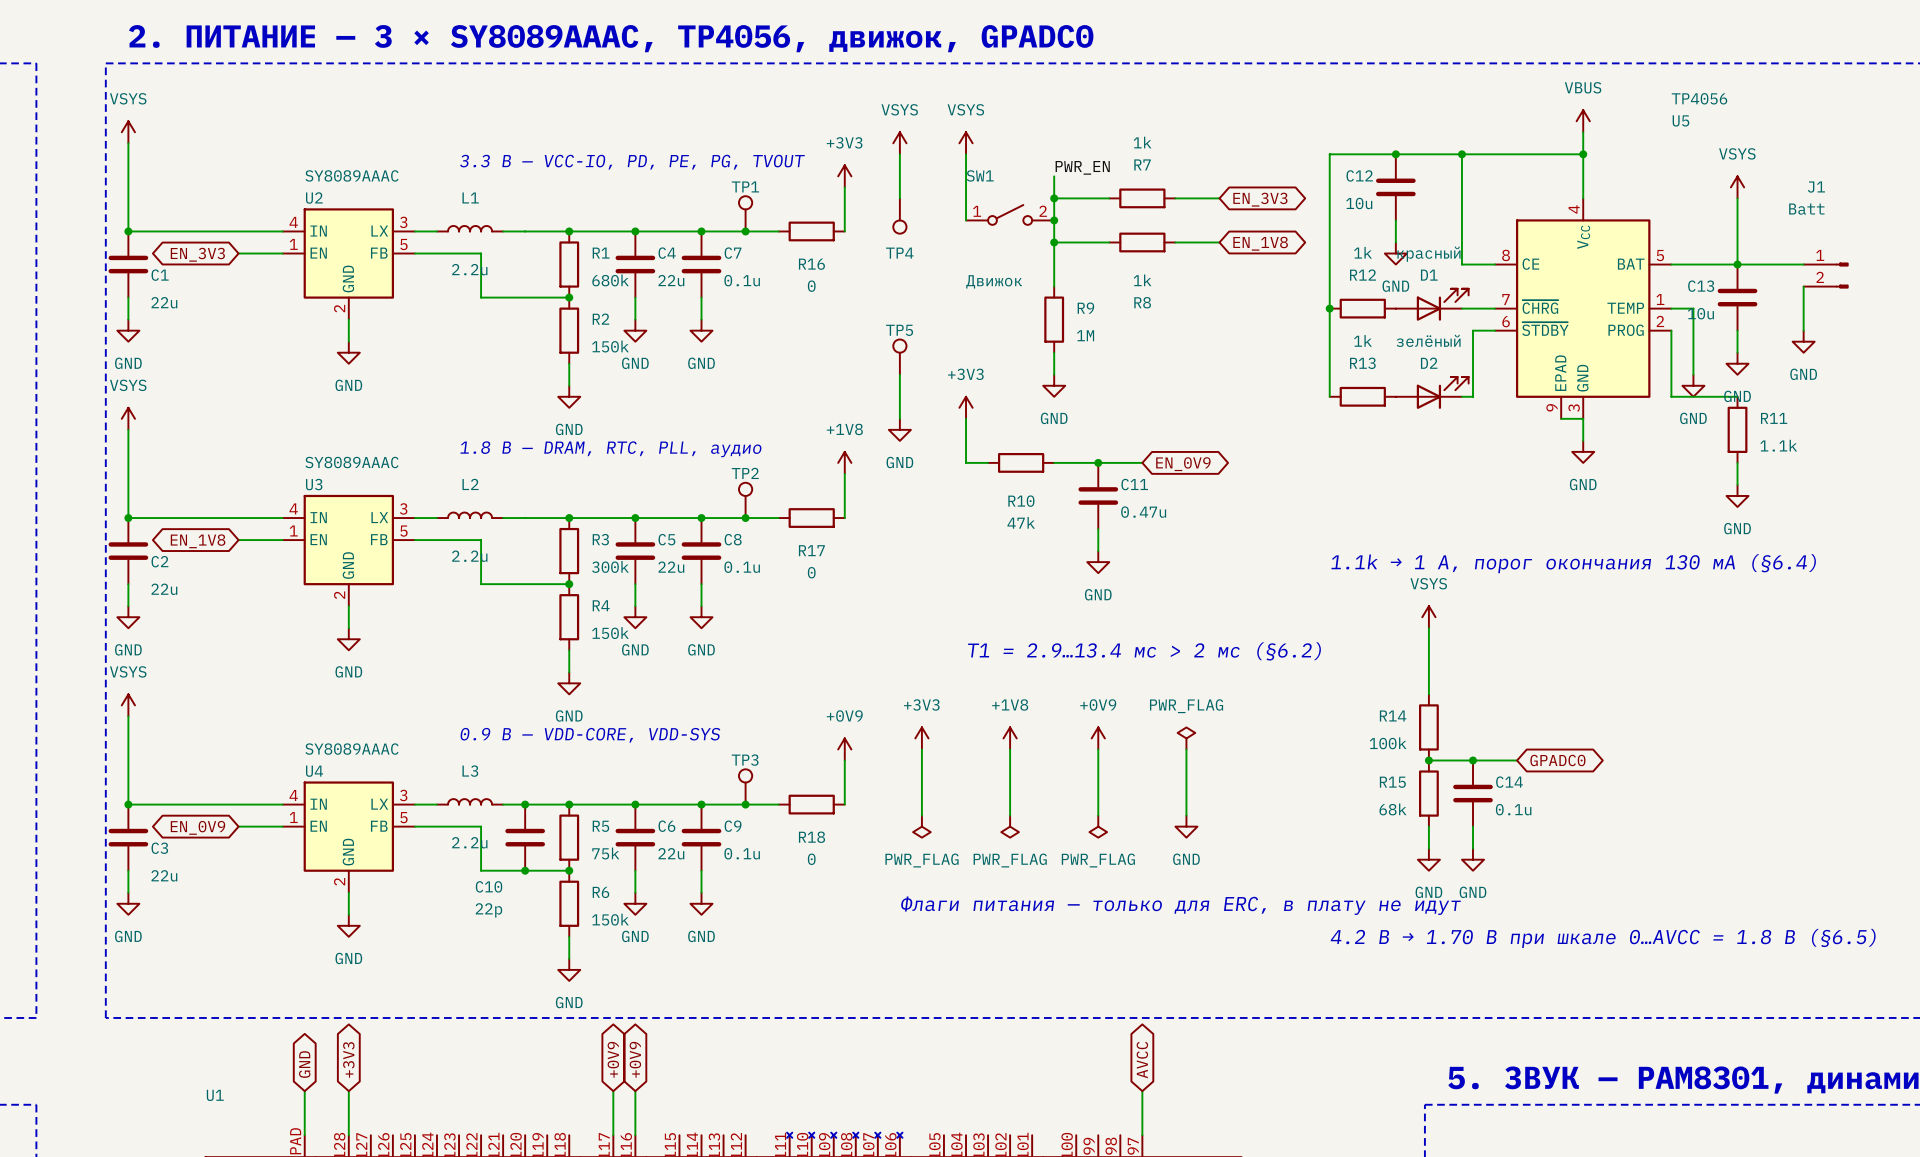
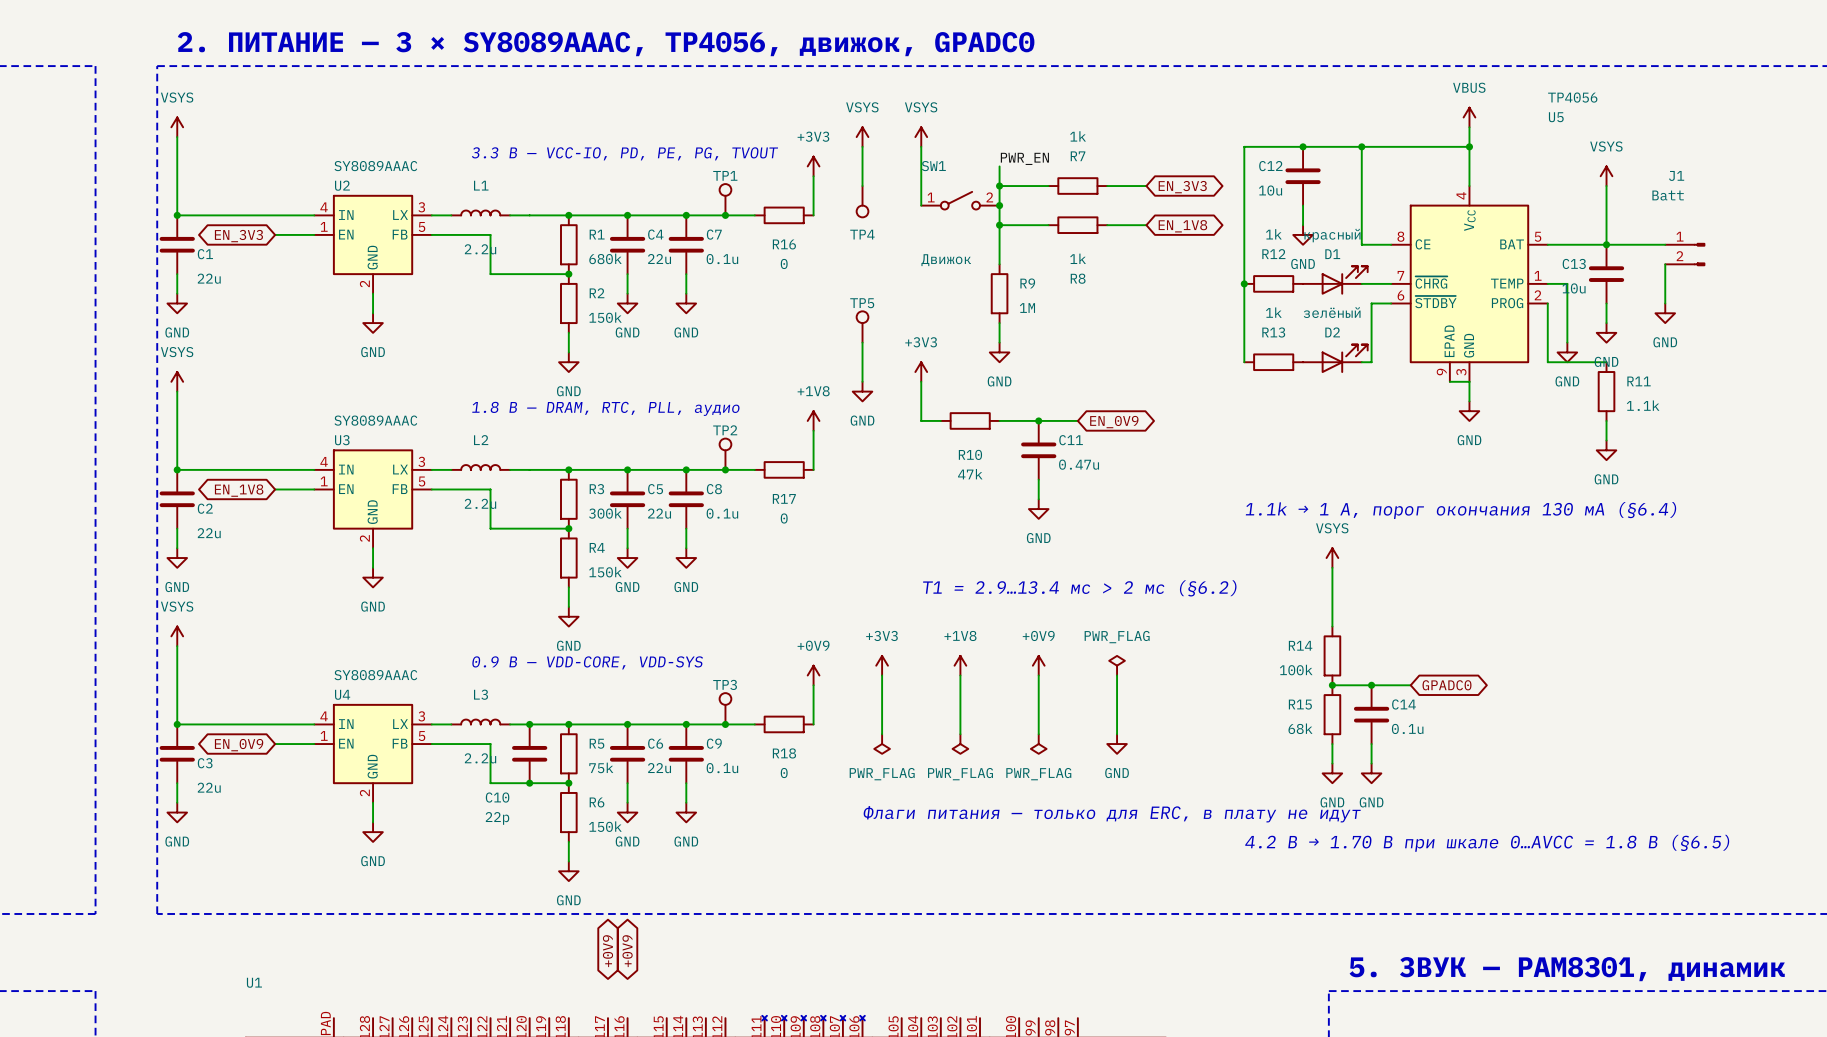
global label: +3V3 (348, 1059) -> none
global label: AVCC (1142, 1060) -> none
global label: GND (304, 1064) -> none
wire: (304, 1091) (304, 1135) -> none
wire: (348, 1091) (348, 1135) -> none
wire: (613, 1091) (613, 1135) -> none
wire: (635, 1091) (635, 1135) -> none
wire: (1142, 1091) (1142, 1135) -> none

